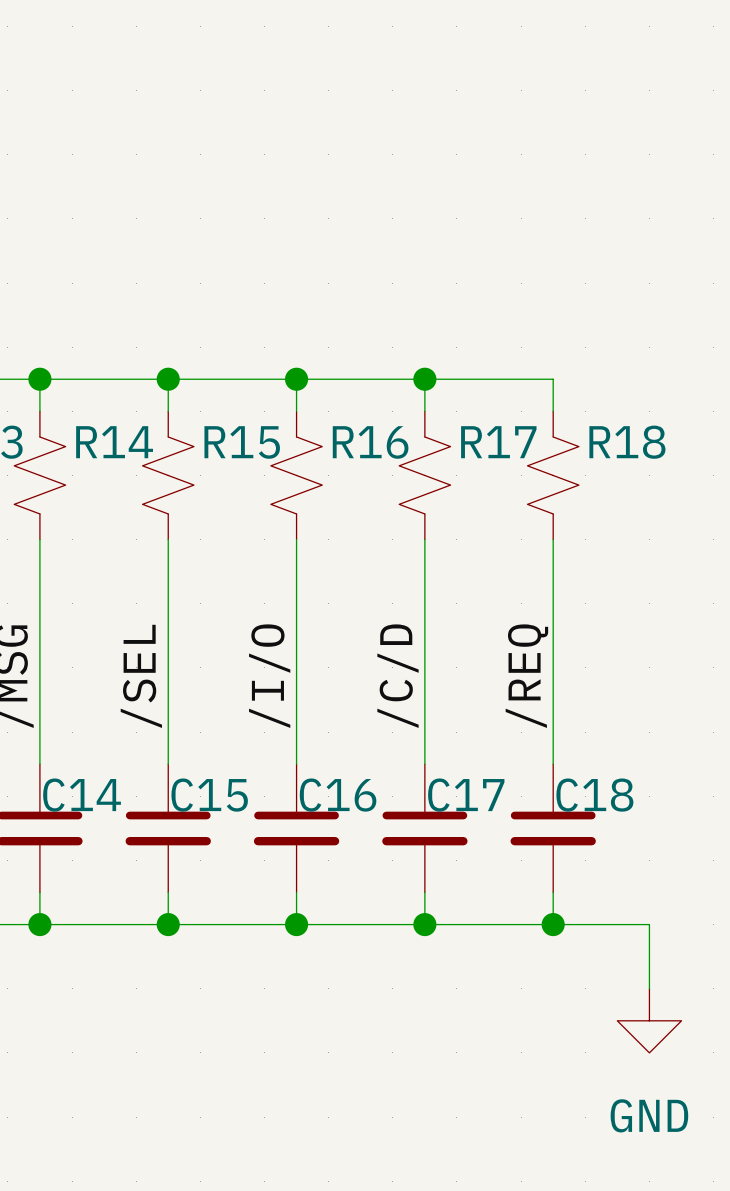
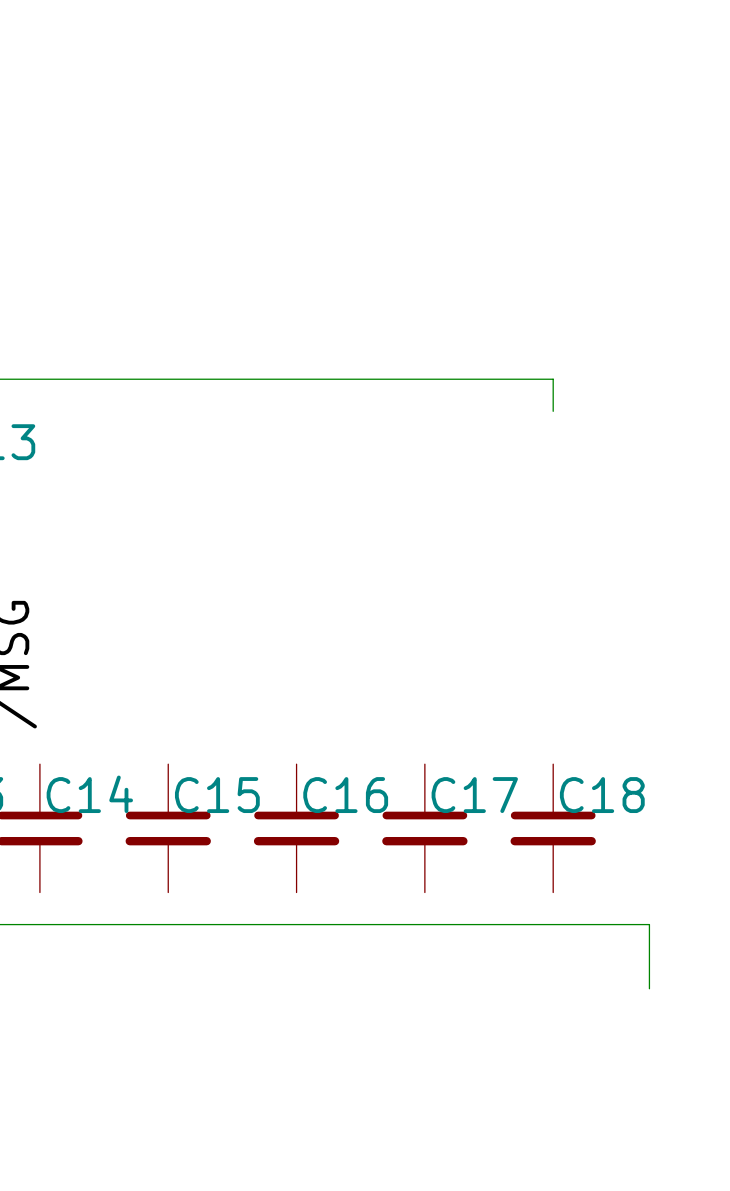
wire: (39, 379) (39, 411) -> none
junction: (39, 379) -> none
wire: (168, 379) (168, 411) -> none
junction: (168, 379) -> none
wire: (296, 379) (296, 411) -> none
junction: (296, 379) -> none
wire: (424, 379) (424, 411) -> none
junction: (424, 379) -> none
R14: (39, 475) -> none
R15: (168, 475) -> none
R16: (296, 475) -> none
R17: (424, 475) -> none
R18: (553, 475) -> none
wire: (39, 539) (39, 764) -> none
wire: (168, 539) (168, 764) -> none
wire: (296, 539) (296, 764) -> none
wire: (424, 539) (424, 764) -> none
wire: (553, 539) (553, 764) -> none
label: /SEL (141, 676) -> none
label: /I/O (269, 676) -> none
label: /C/D (397, 676) -> none
label: /REQ (526, 676) -> none
wire: (39, 892) (39, 924) -> none
wire: (168, 892) (168, 924) -> none
wire: (296, 892) (296, 924) -> none
wire: (424, 892) (424, 924) -> none
wire: (553, 892) (553, 924) -> none
junction: (39, 924) -> none
junction: (168, 924) -> none
junction: (296, 924) -> none
junction: (424, 924) -> none
junction: (553, 924) -> none
power symbol: GND (649, 1020) -> none

